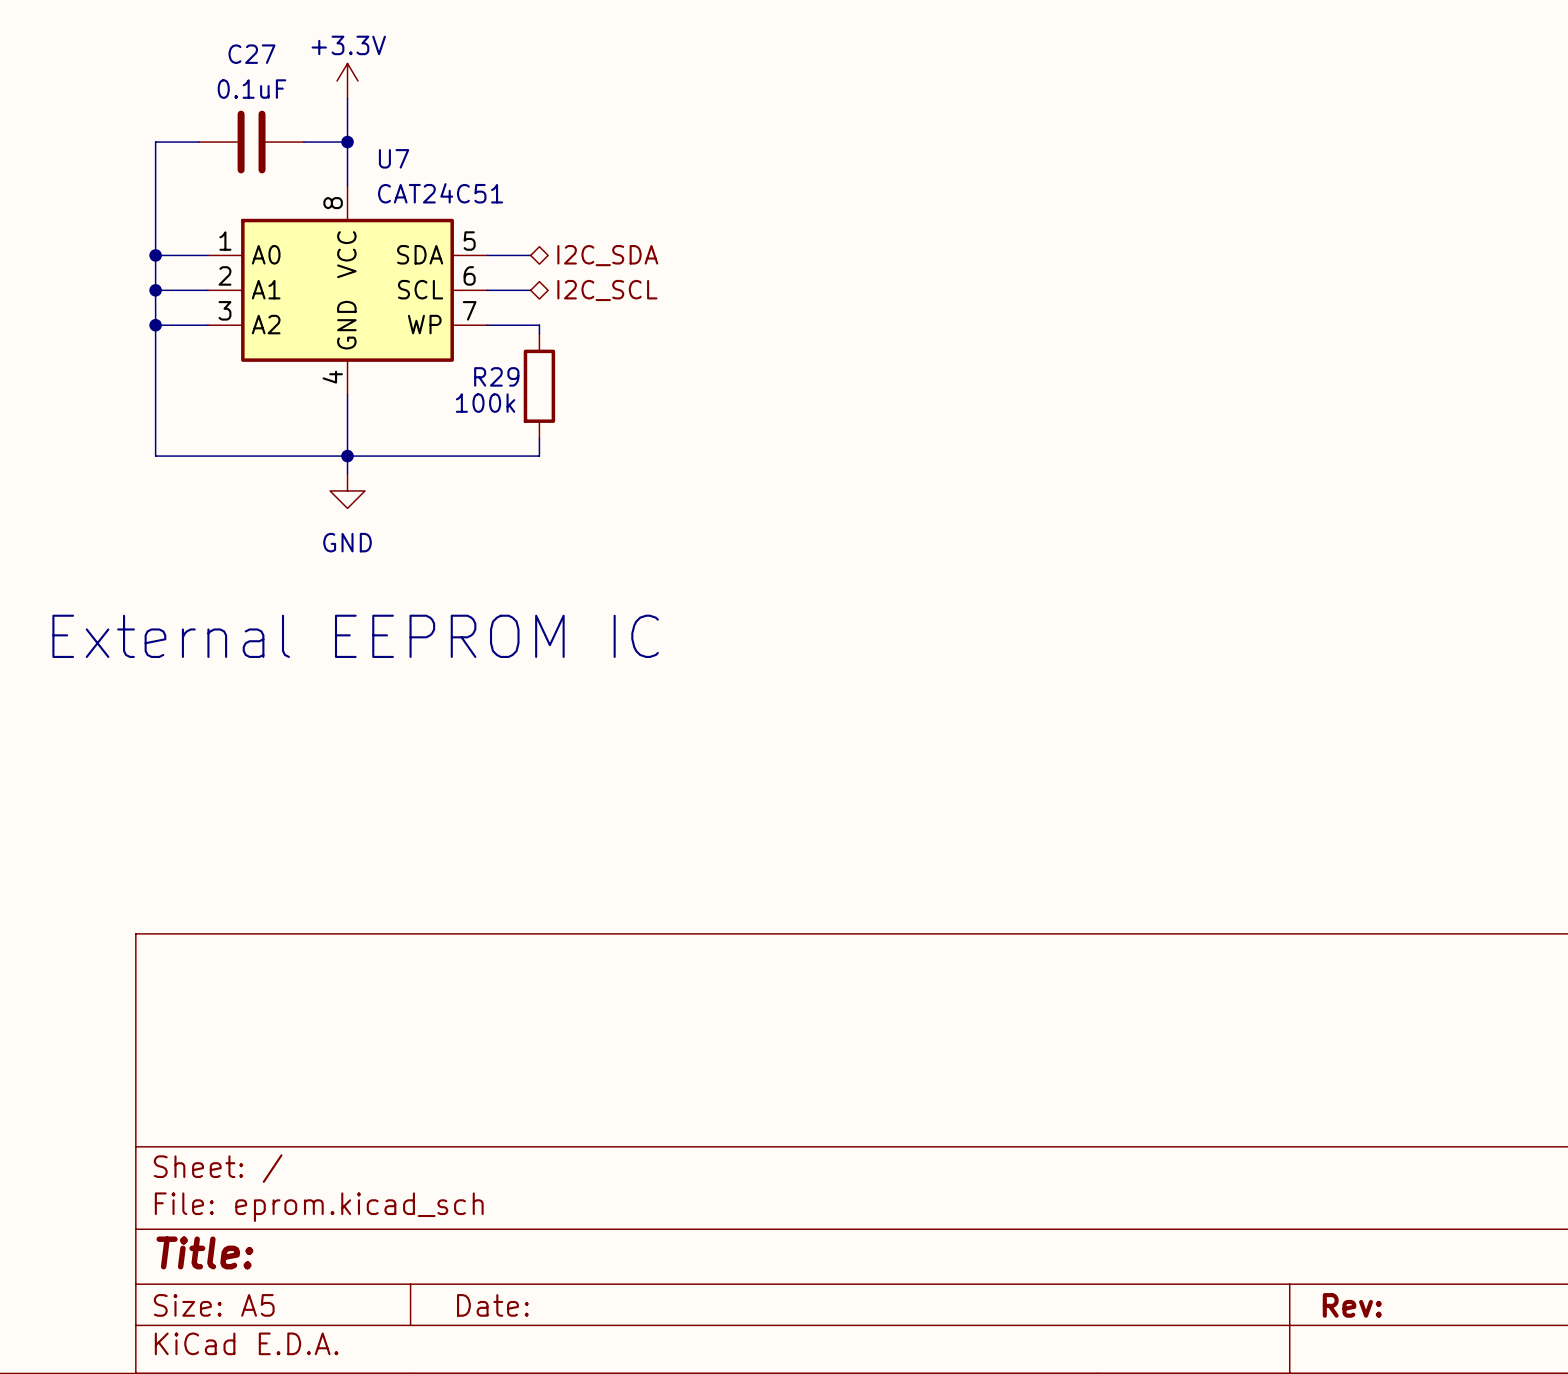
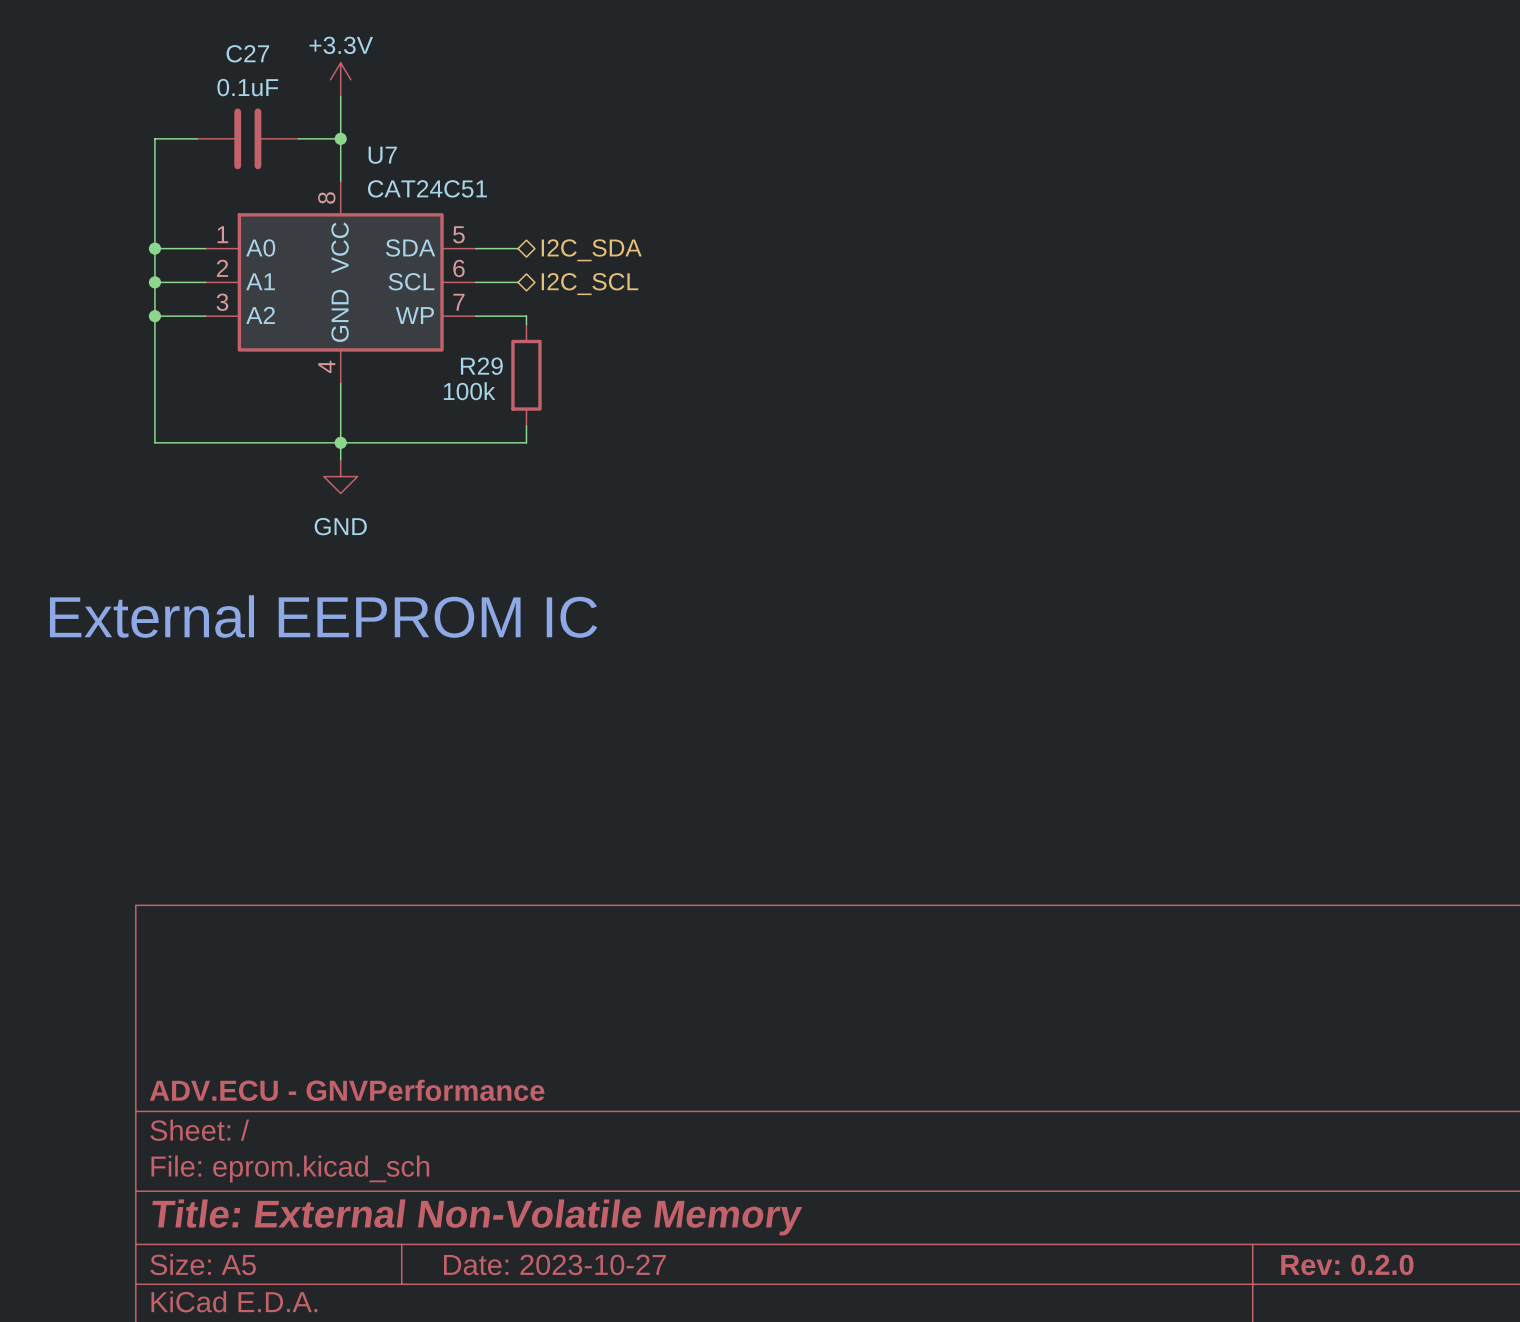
title block: none -> ADV.ECU - GNVPerformance (347, 1090)
title block: Title: (204, 1252) -> Title: External Non-Volatile Memory (477, 1217)
title block: Date: (492, 1305) -> Date: 2023-10-27 (554, 1264)
title block: Rev: (1352, 1305) -> Rev: 0.2.0 (1347, 1264)

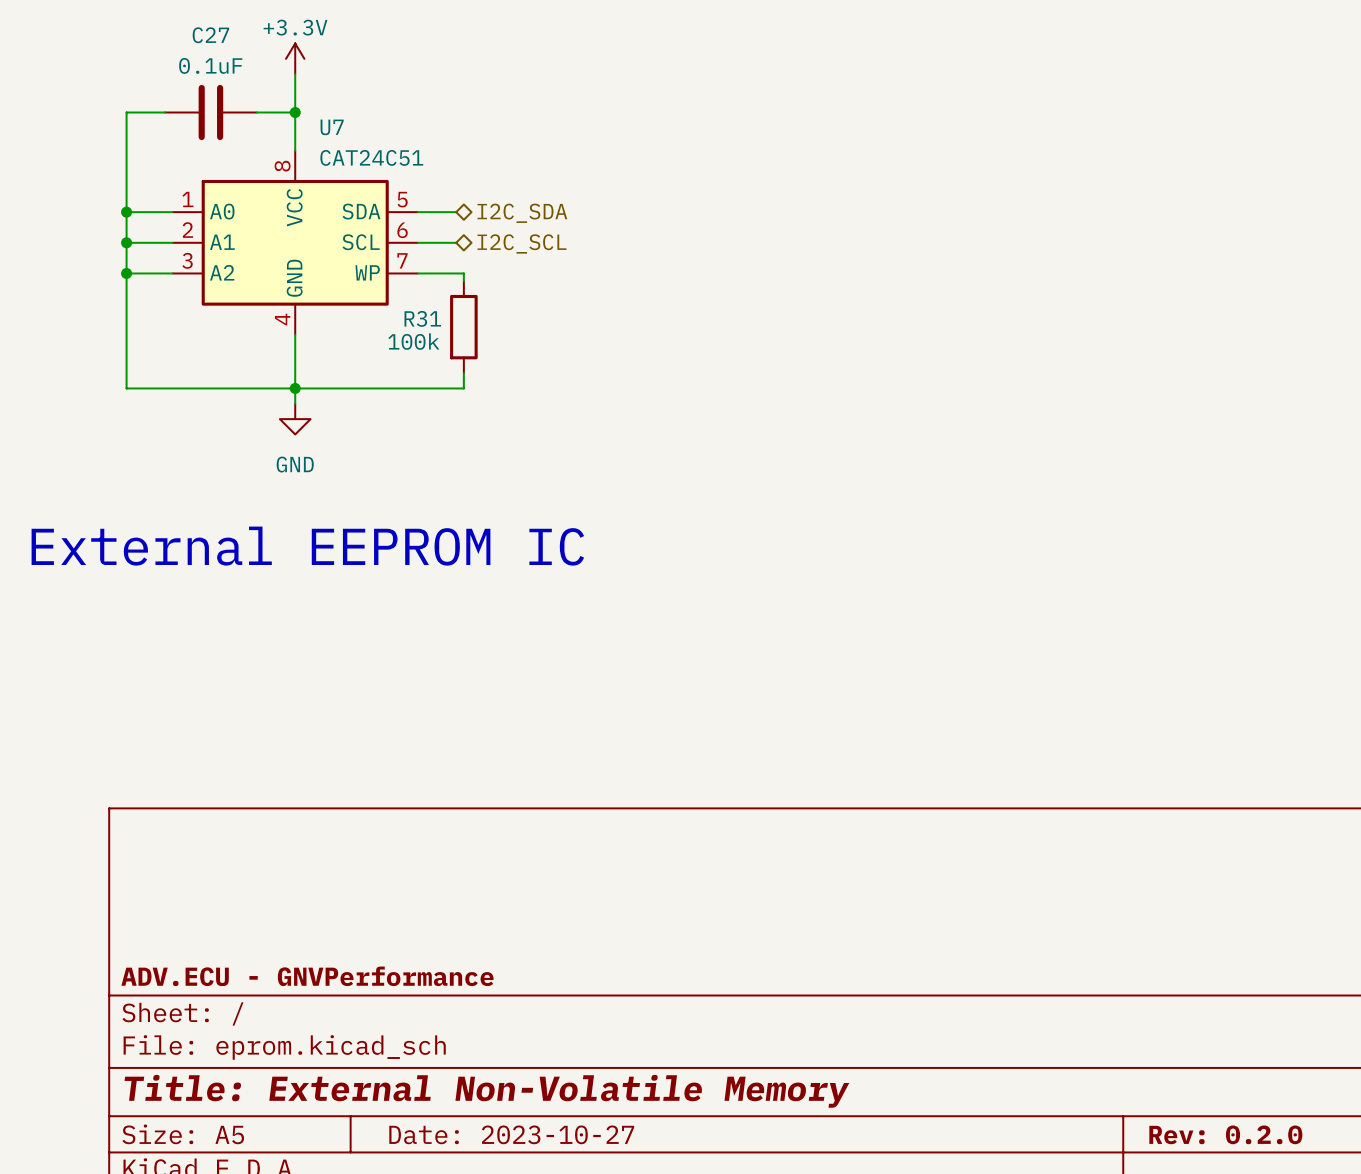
R29 name: R29 (481, 366) -> R31 (422, 318)

